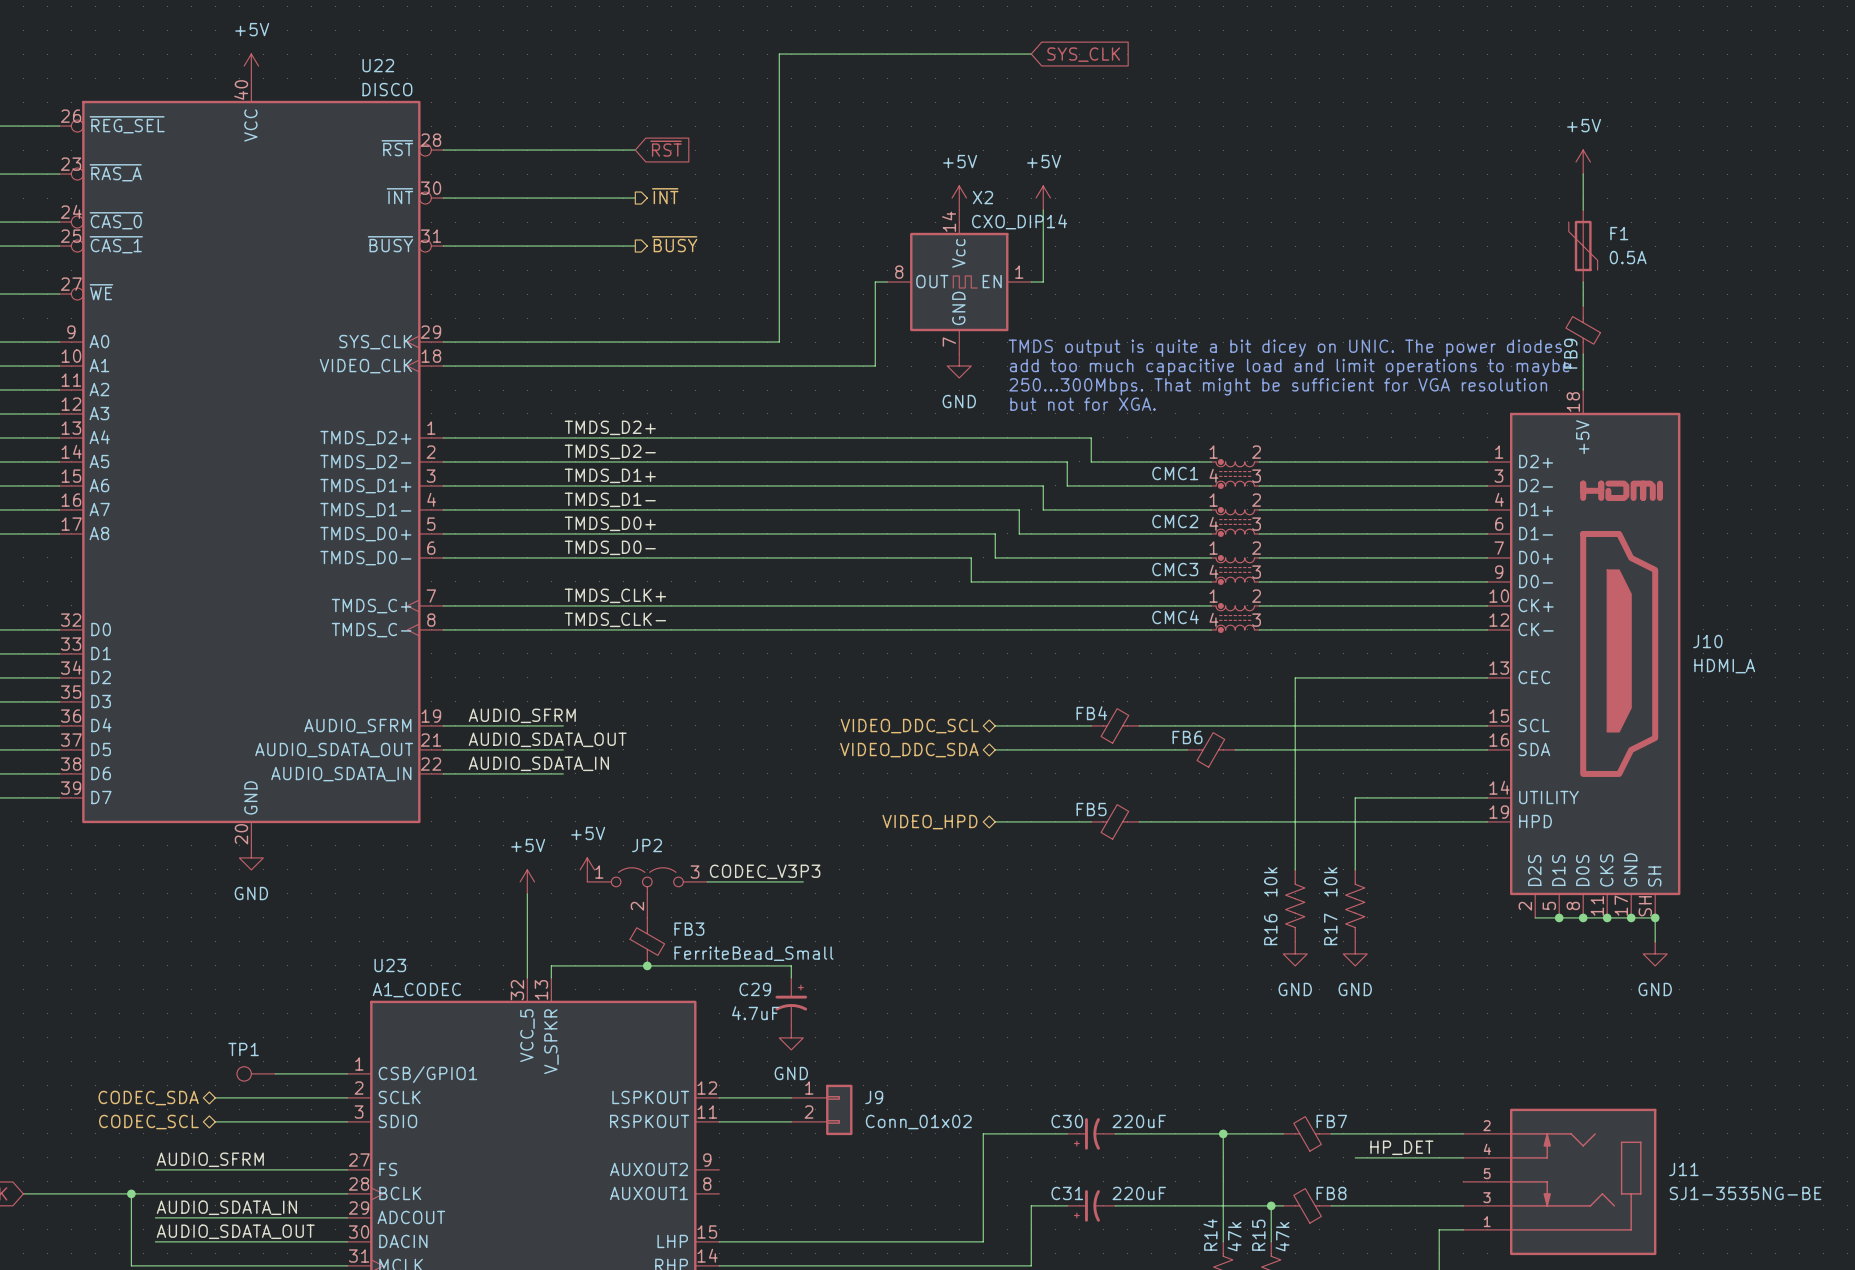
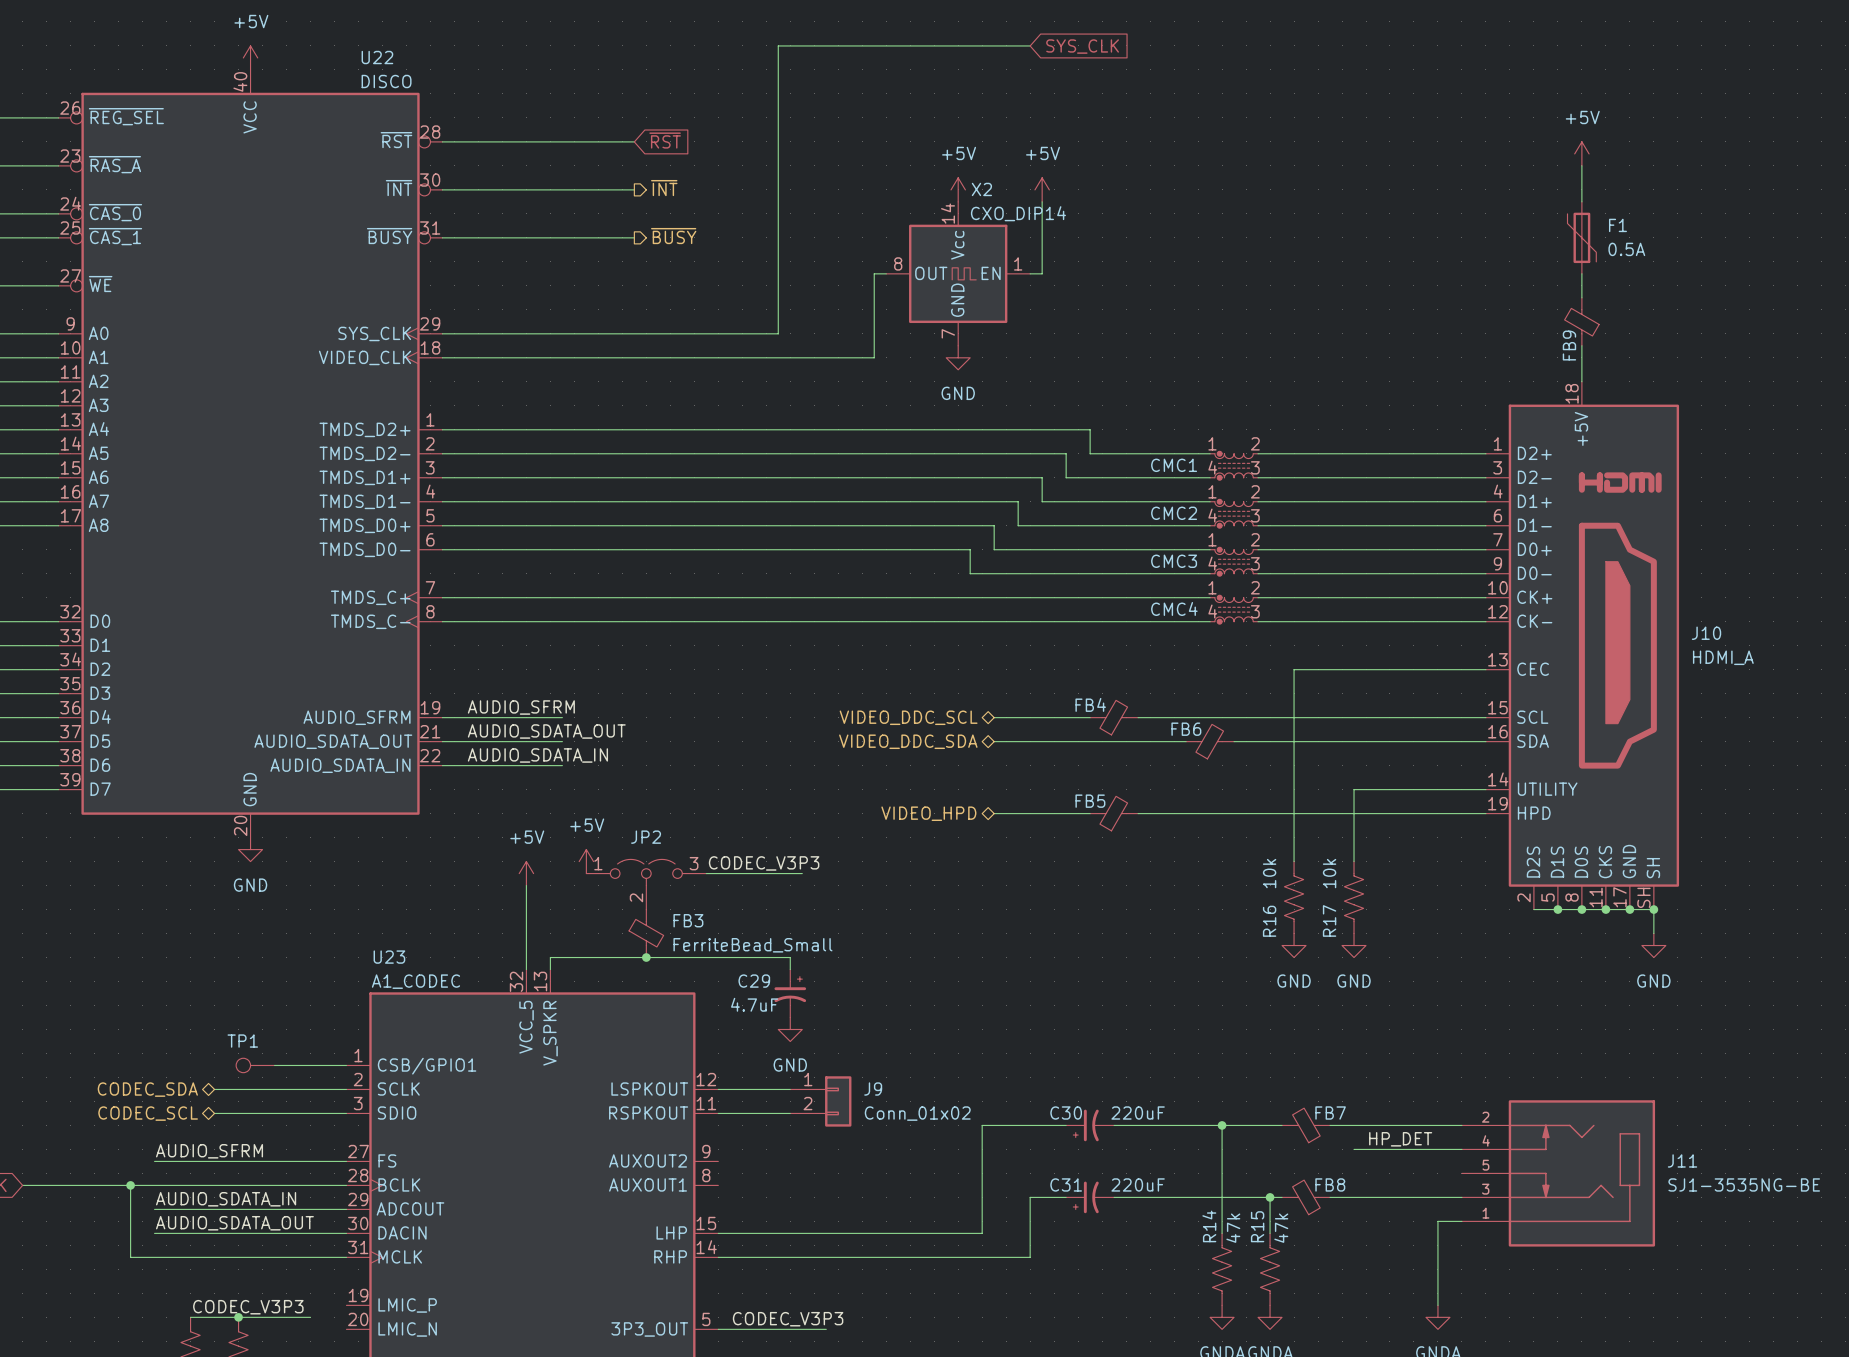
text: TMDS output is quite a bit dicey on UNIC. The power diodes (1285, 348) -> none
text: add too much capacitive load and limit operations to maybe (1289, 367) -> none
text: 250...300Mbps. That might be sufficient for VGA resolution (1278, 386) -> none
text: but not for XGA. (1083, 404) -> none
label: TMDS_D2+ (610, 427) -> none
label: TMDS_D2- (610, 451) -> none
label: TMDS_D1+ (610, 475) -> none
label: TMDS_D1- (610, 499) -> none
label: TMDS_D0+ (610, 523) -> none
label: TMDS_D0- (610, 547) -> none
label: TMDS_CLK+ (615, 595) -> none
label: TMDS_CLK- (615, 619) -> none

